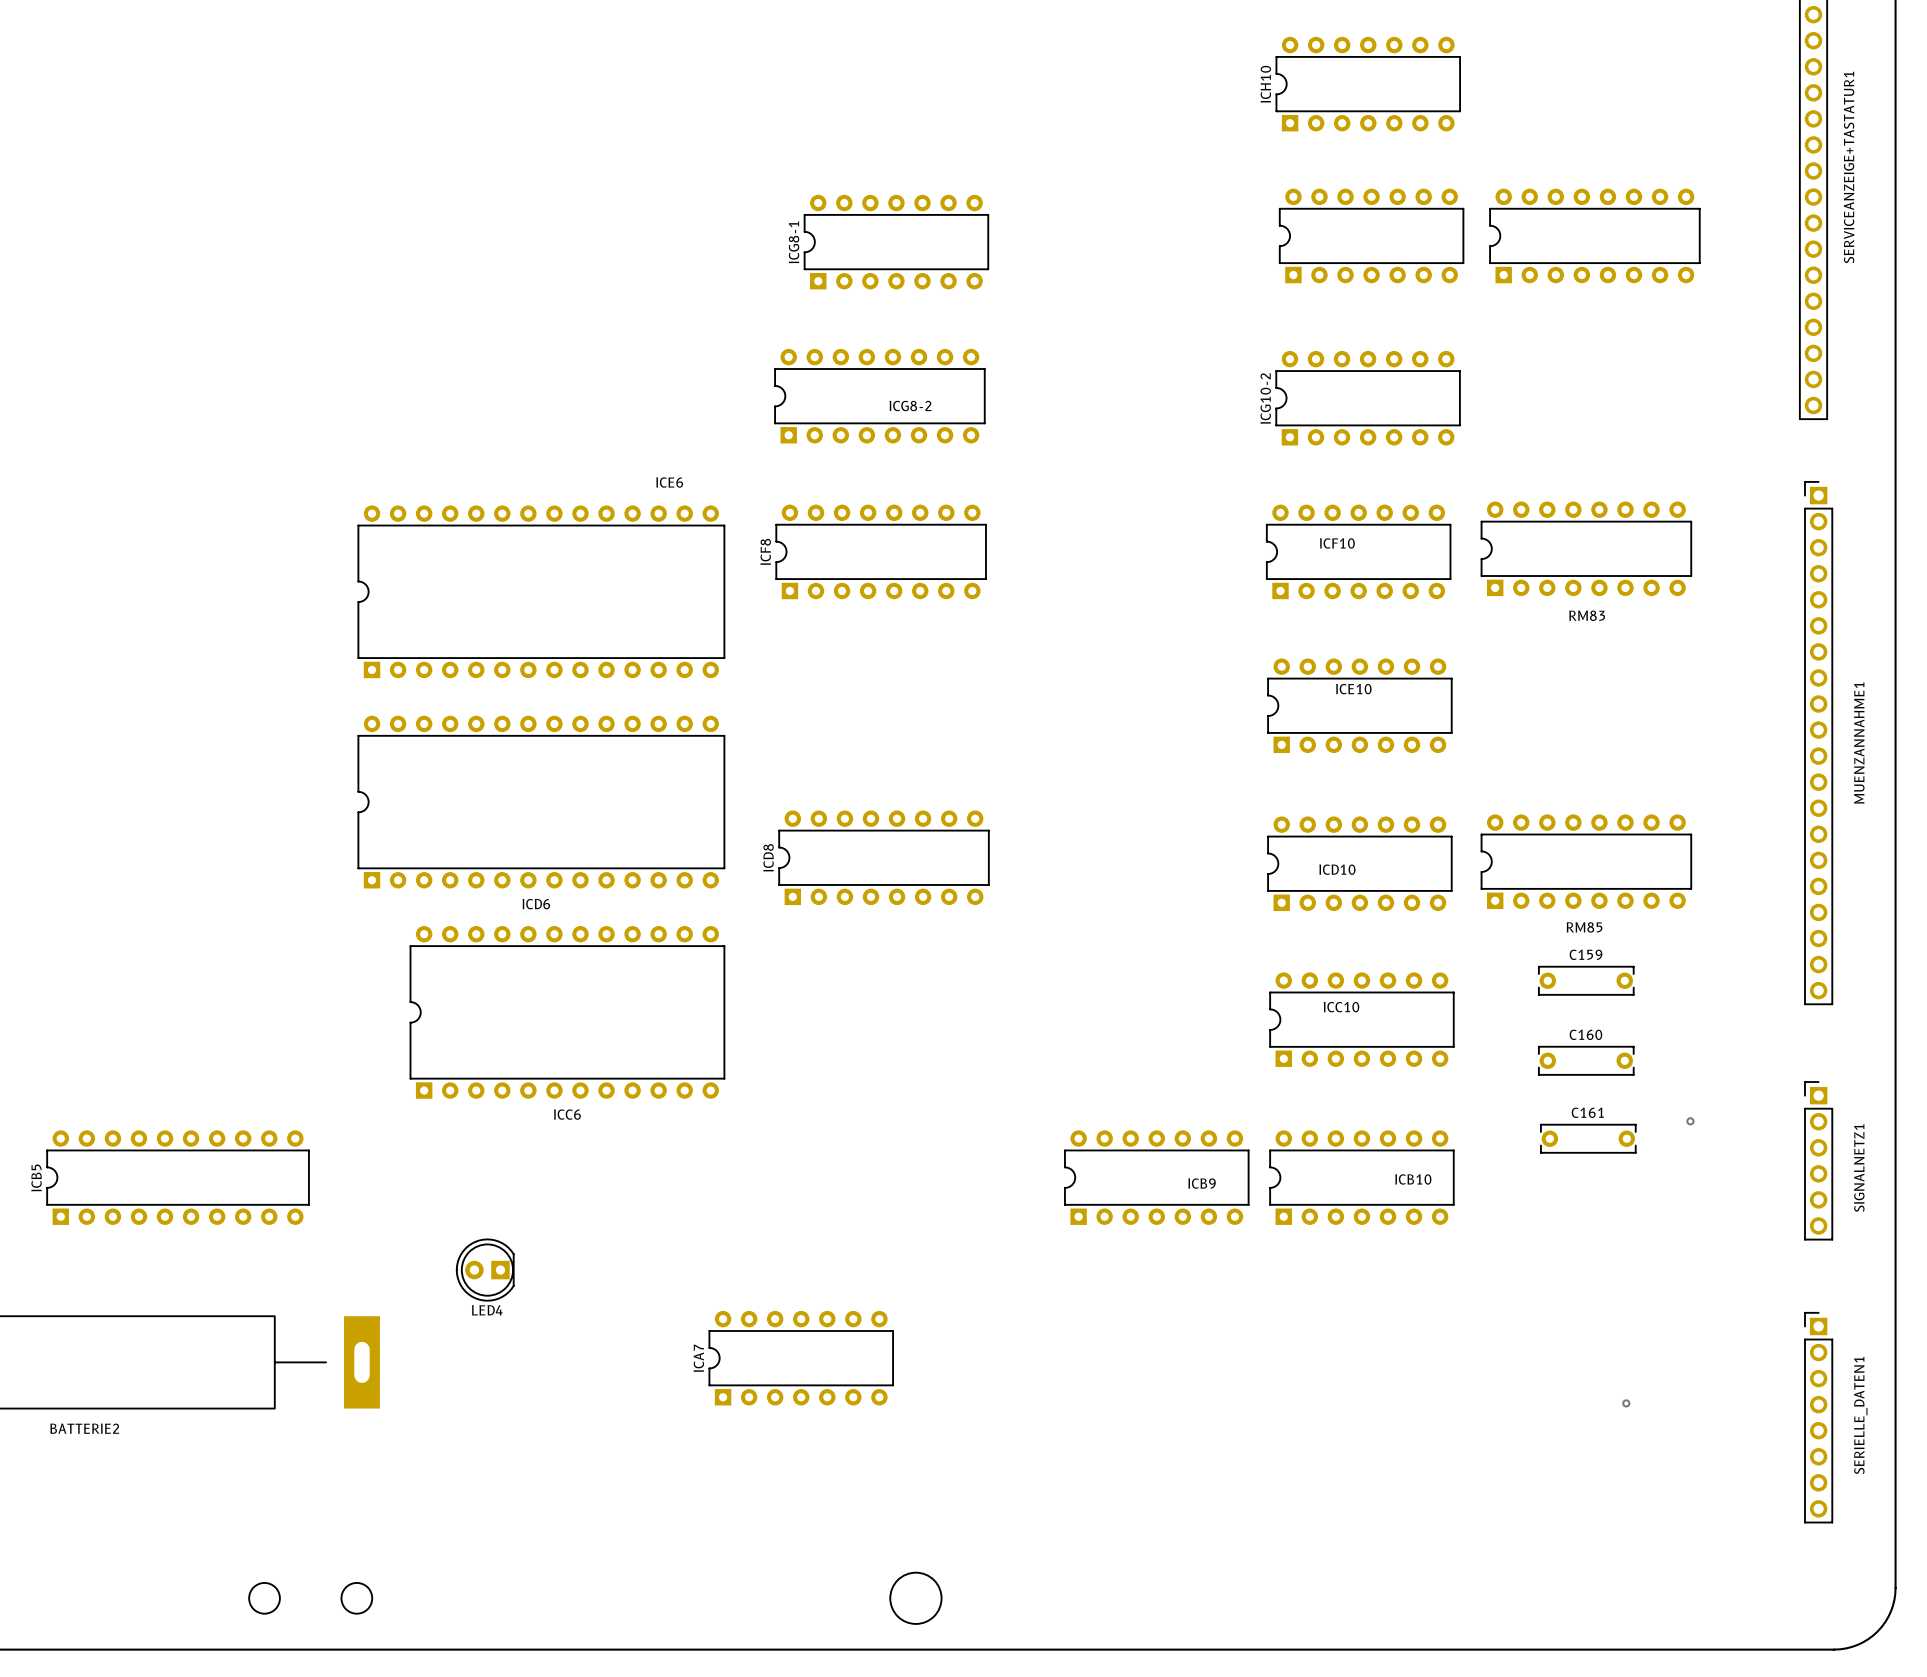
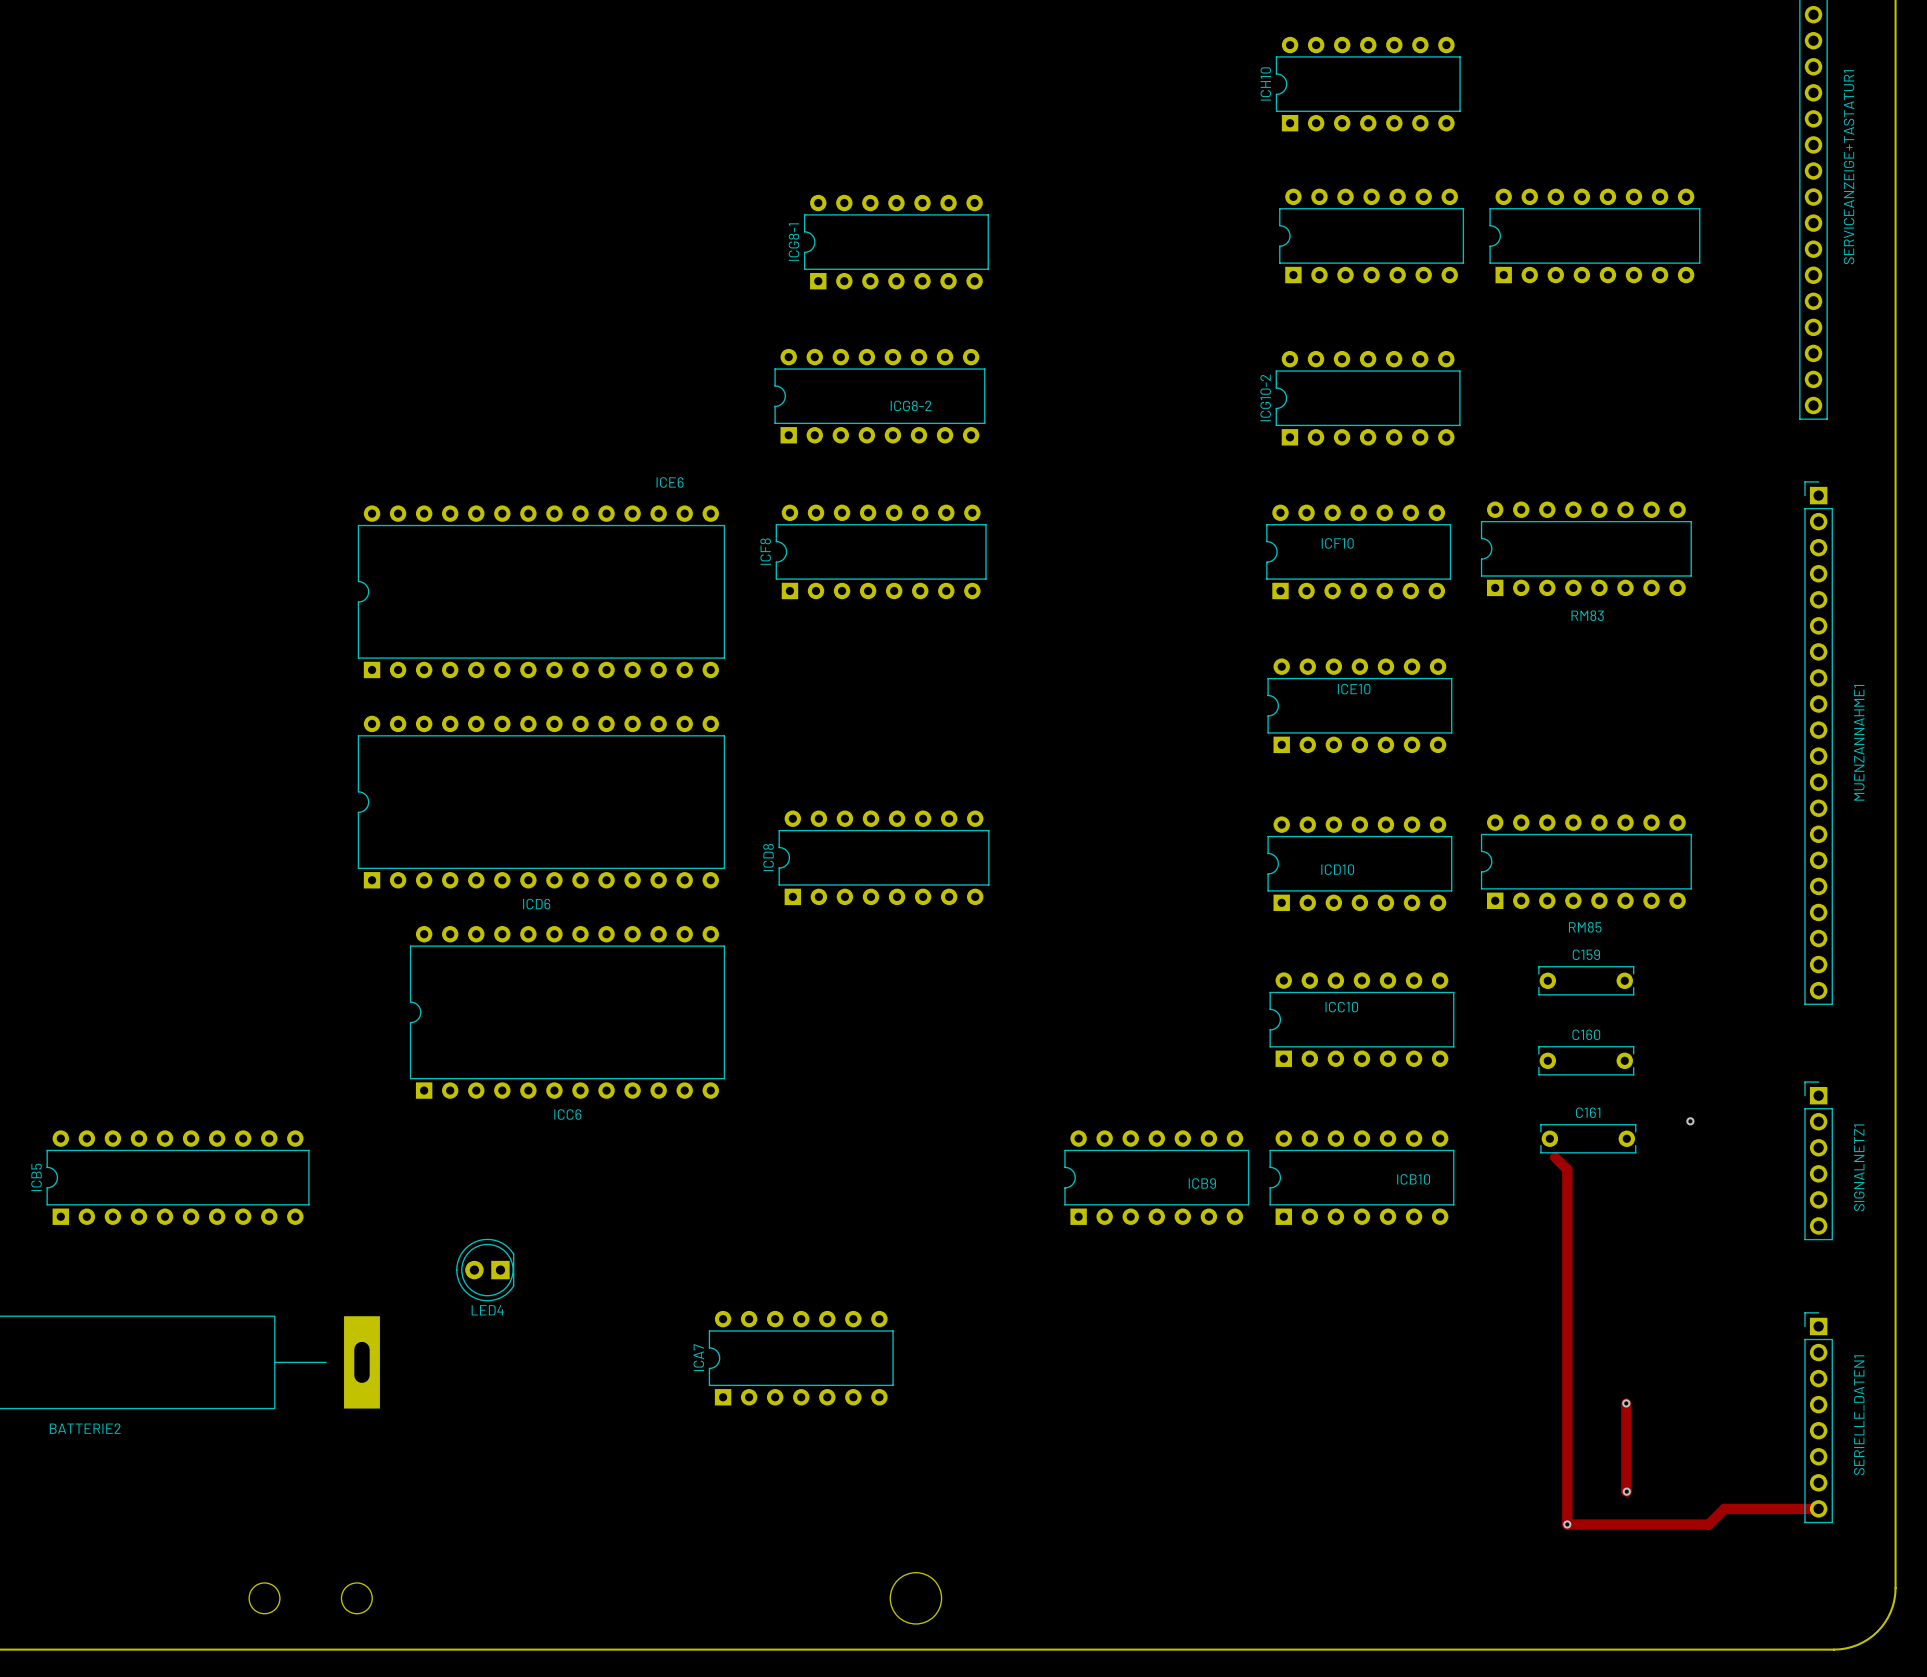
track: none -> (1555, 1157) (1567, 1169) (1567, 1524) (1708, 1524) (1724, 1508) (1818, 1508)
track: none -> (1626, 1403) (1626, 1491)
via: none -> (1626, 1491)
via: none -> (1567, 1524)

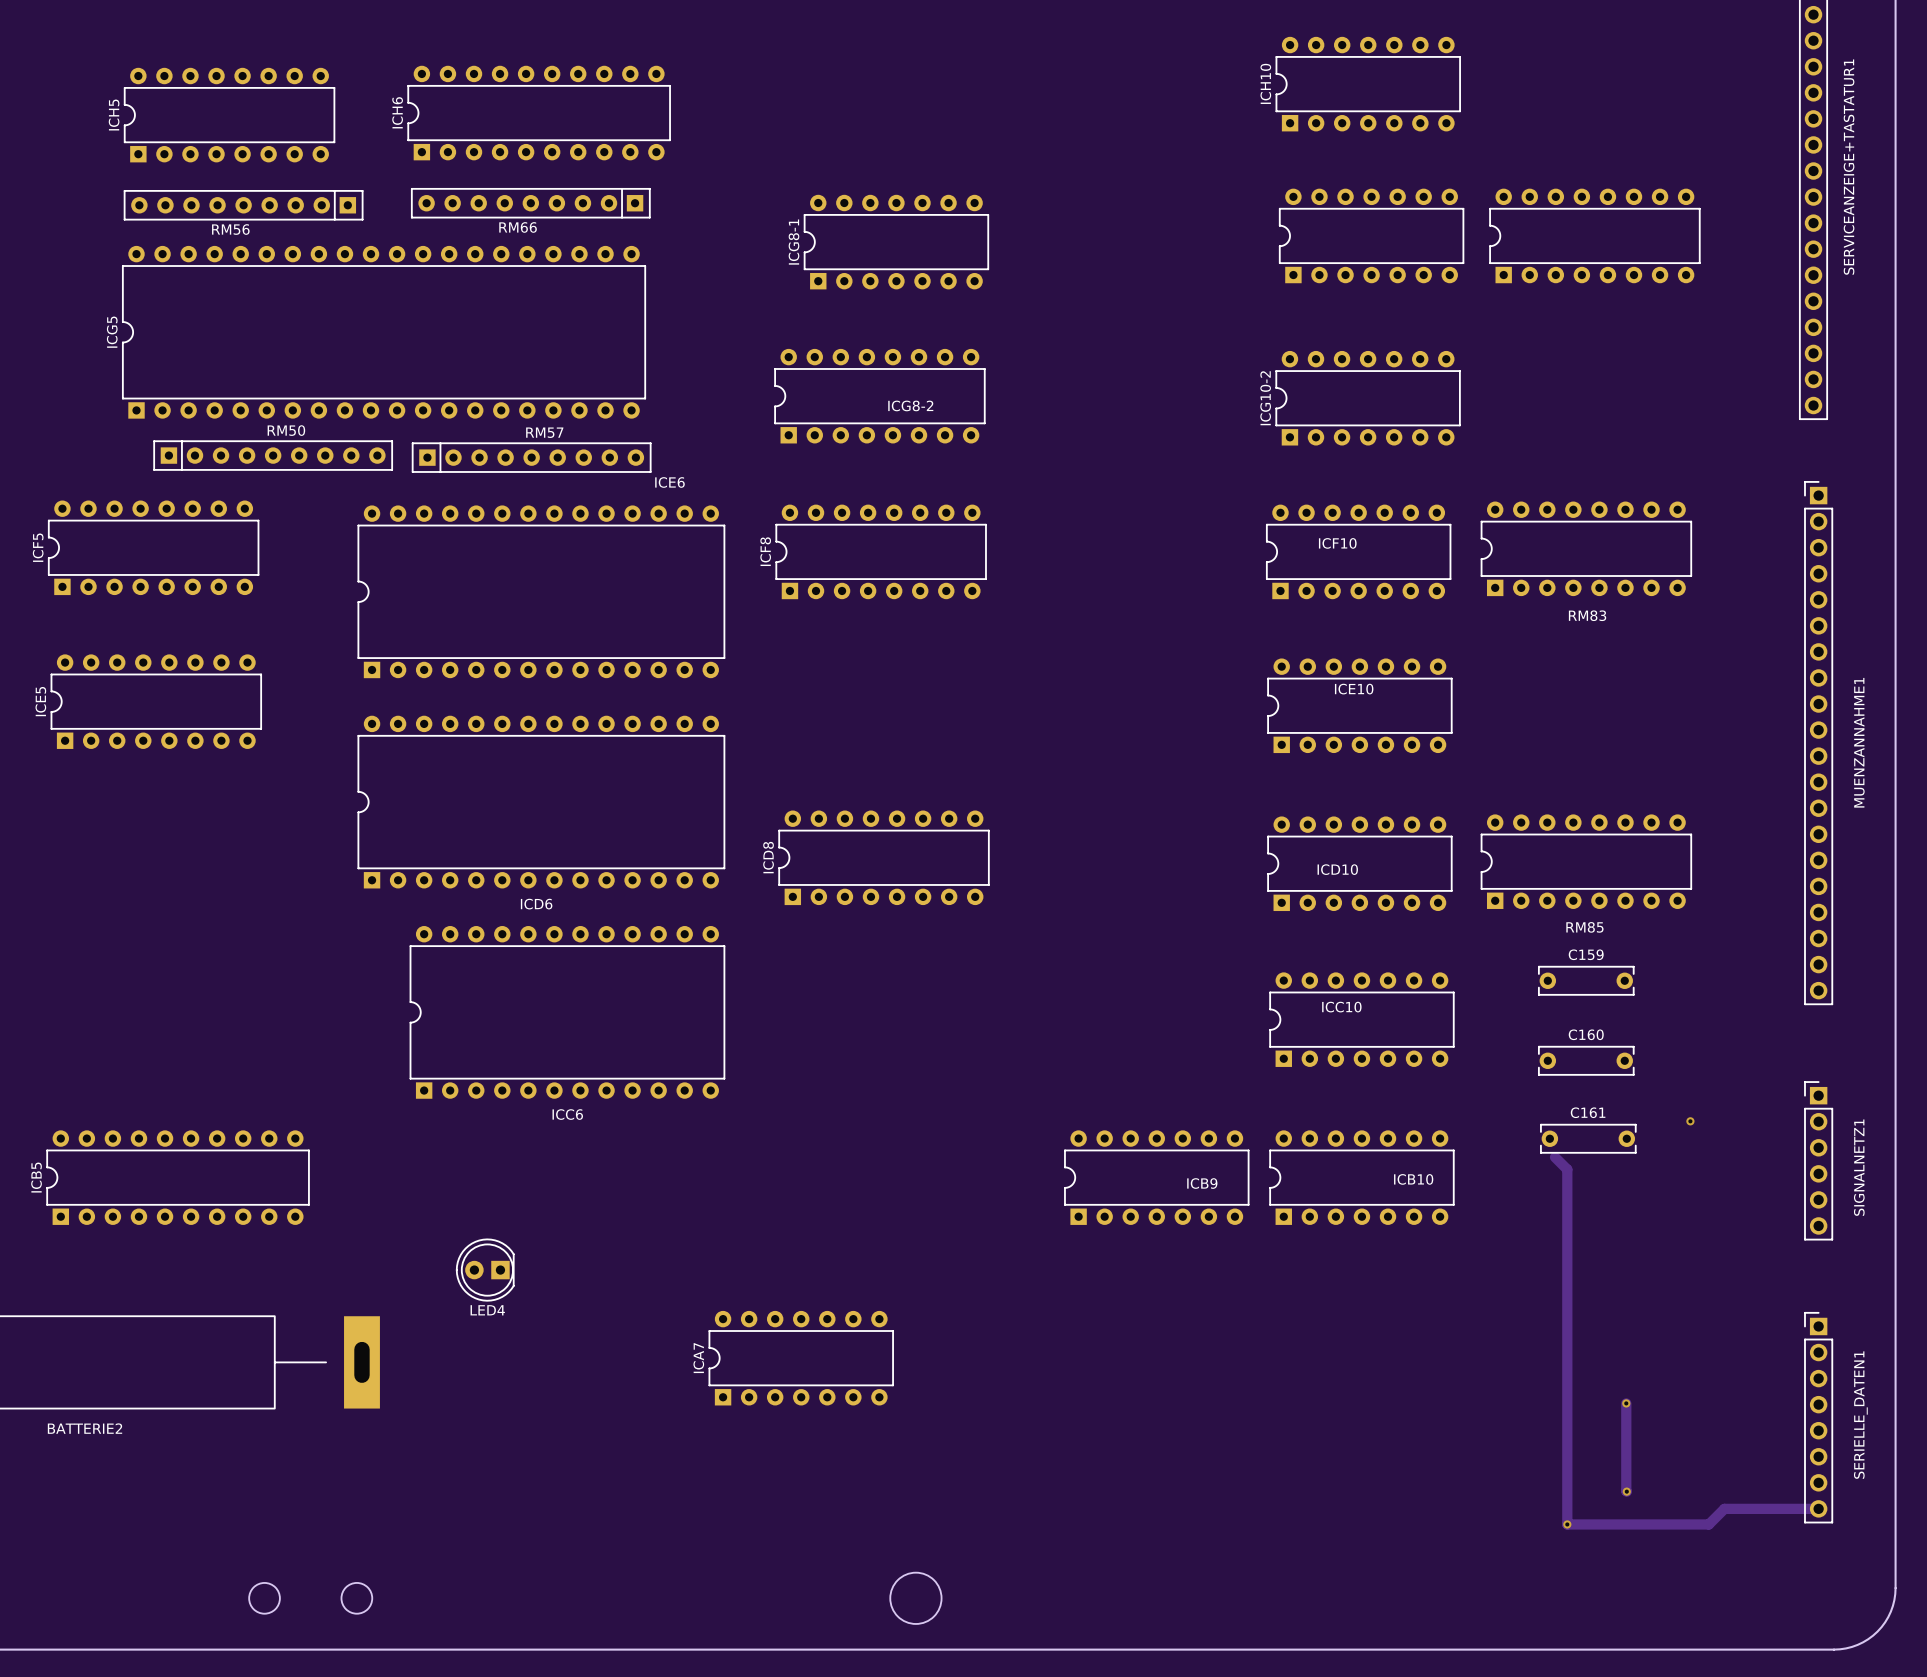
ICH6: none -> (539, 113)
ICH5: none -> (229, 115)
RM66: none -> (530, 203)
RM56: none -> (243, 205)
ICG5: none -> (384, 332)
RM50: none -> (273, 455)
RM57: none -> (531, 457)
ICF5: none -> (153, 547)
ICE5: none -> (156, 701)

